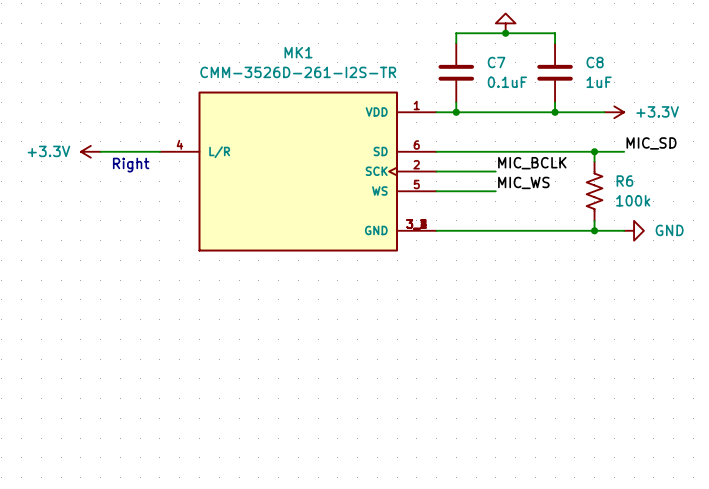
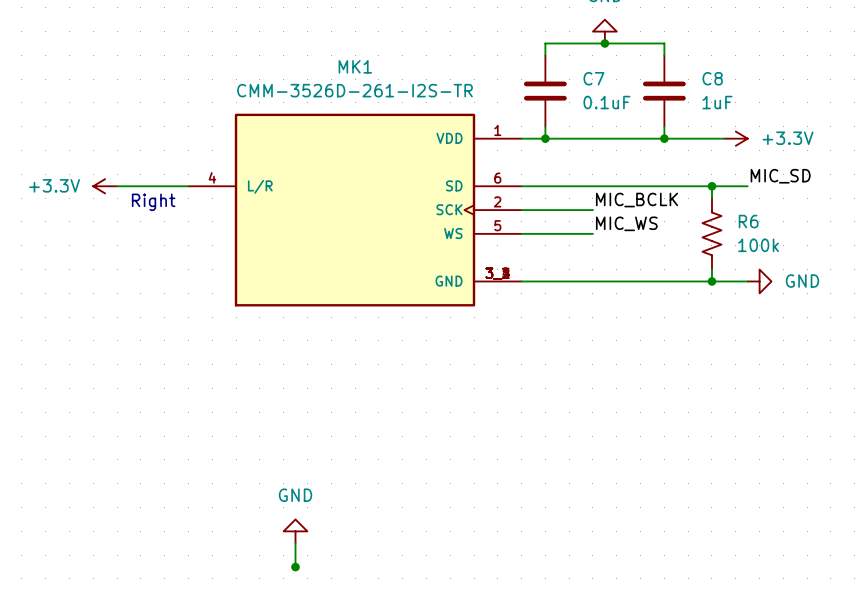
power symbol: none -> GND (295, 531)
wire: none -> (295, 543) (295, 567)
junction: none -> (295, 567)

